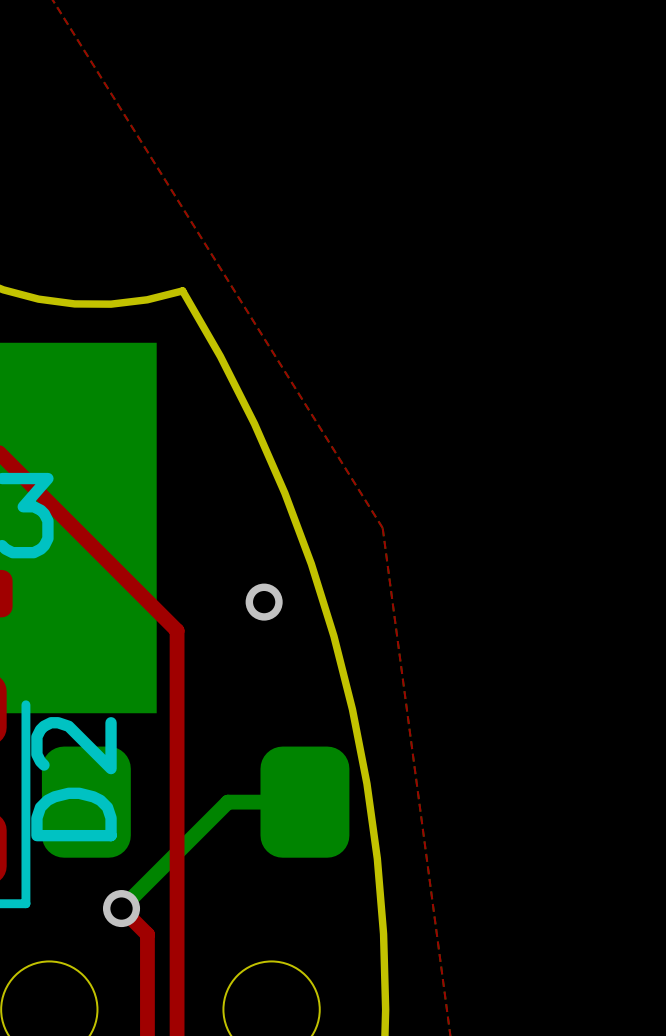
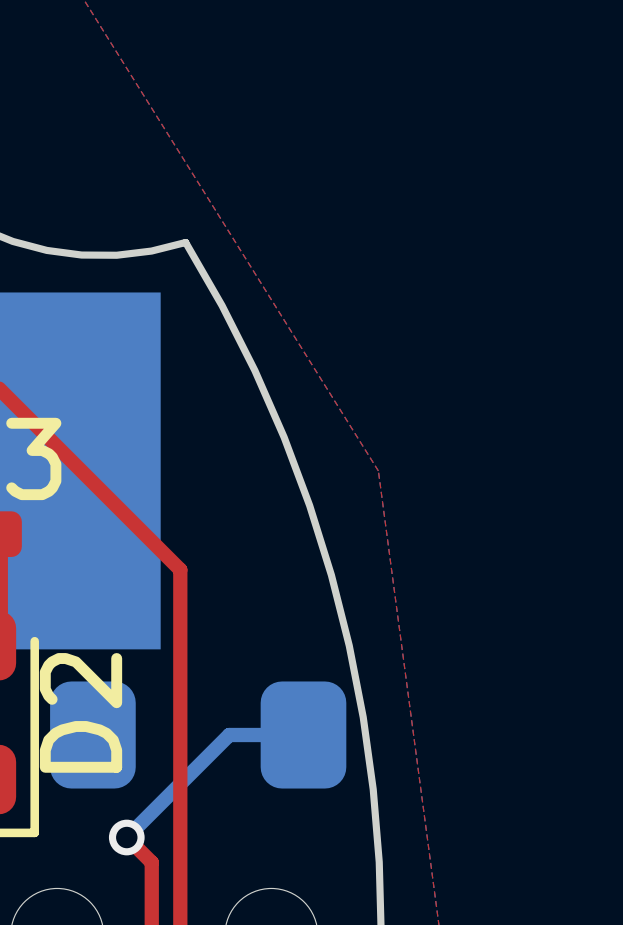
via: (264, 602) -> none

